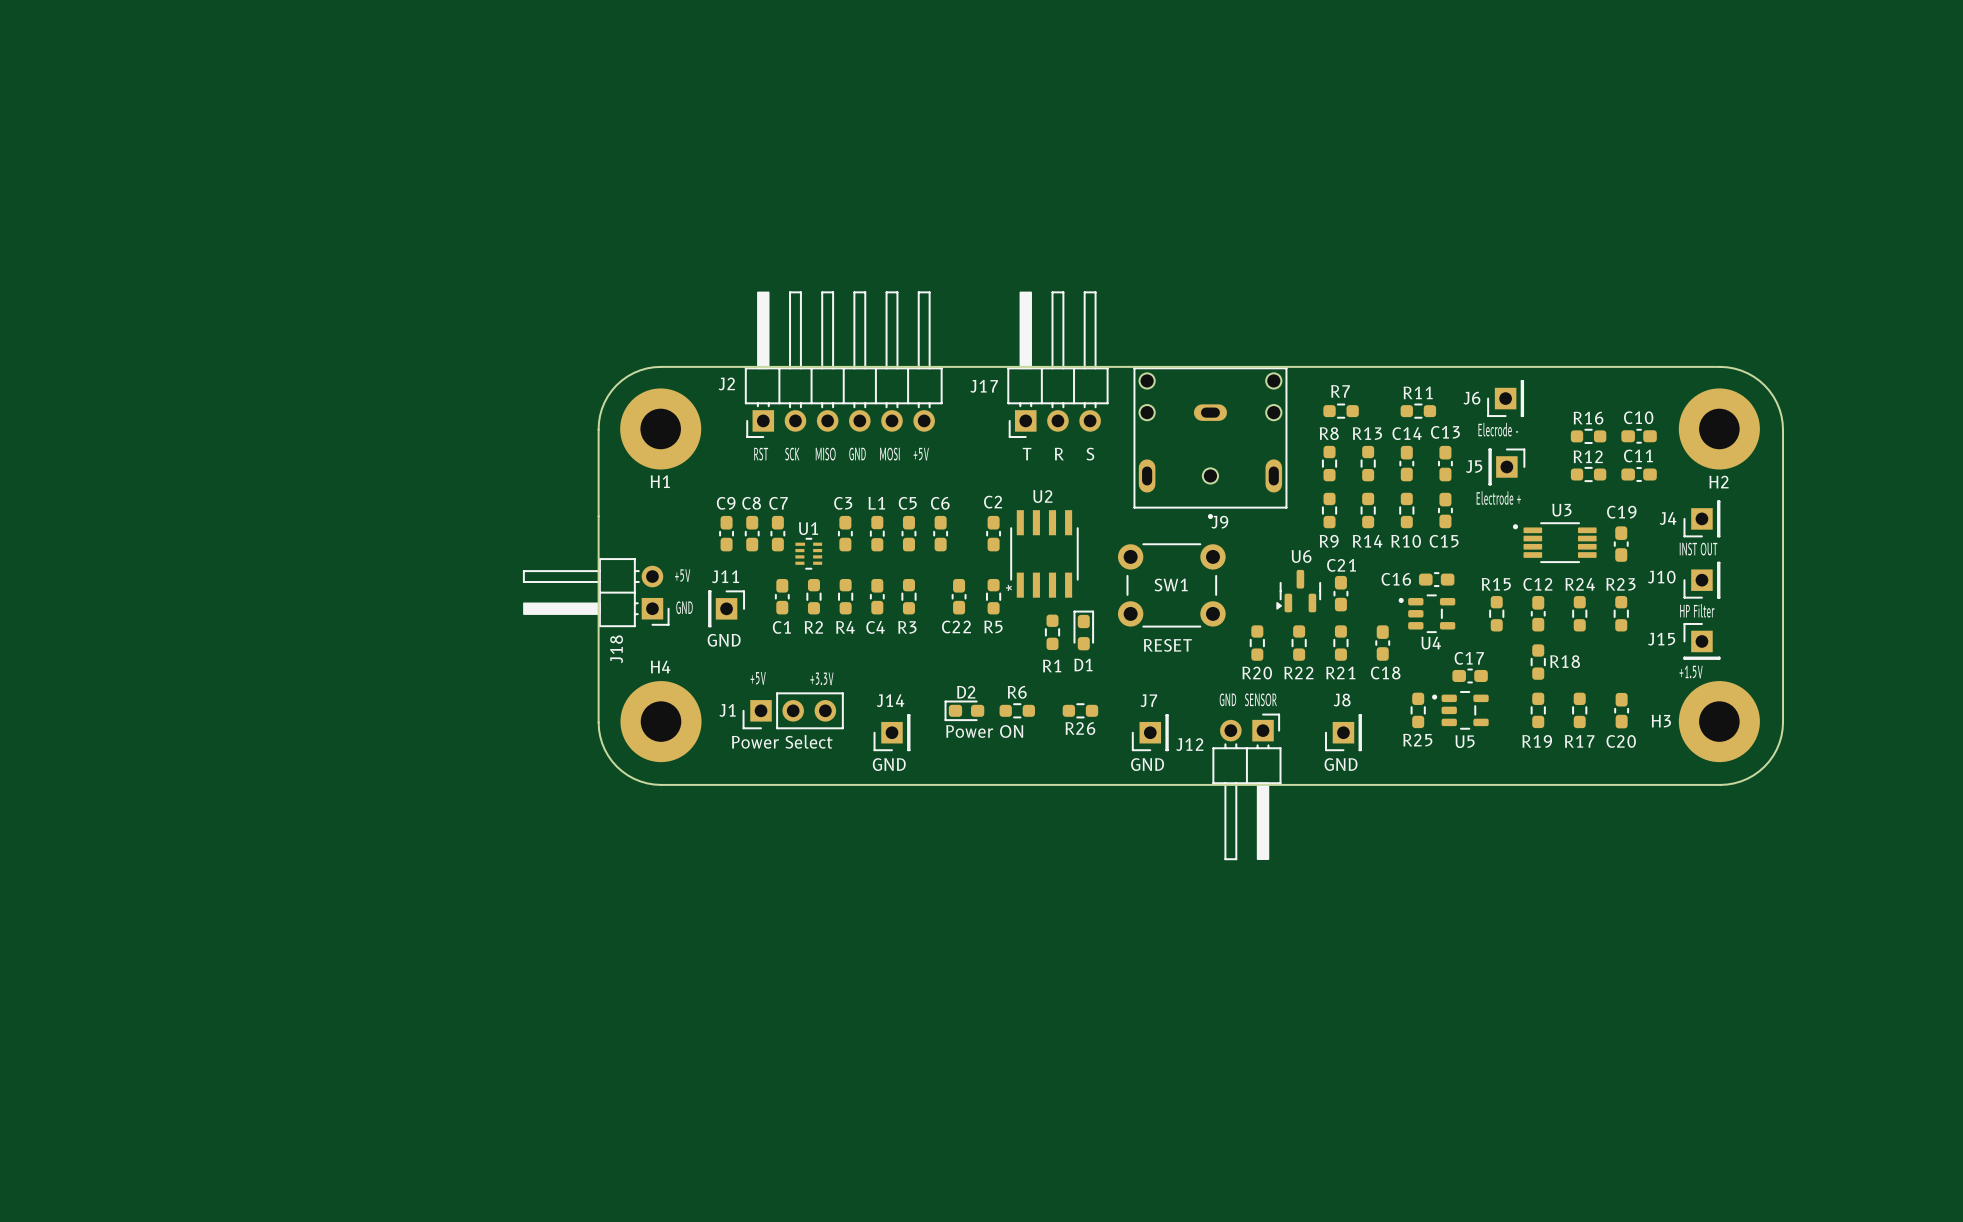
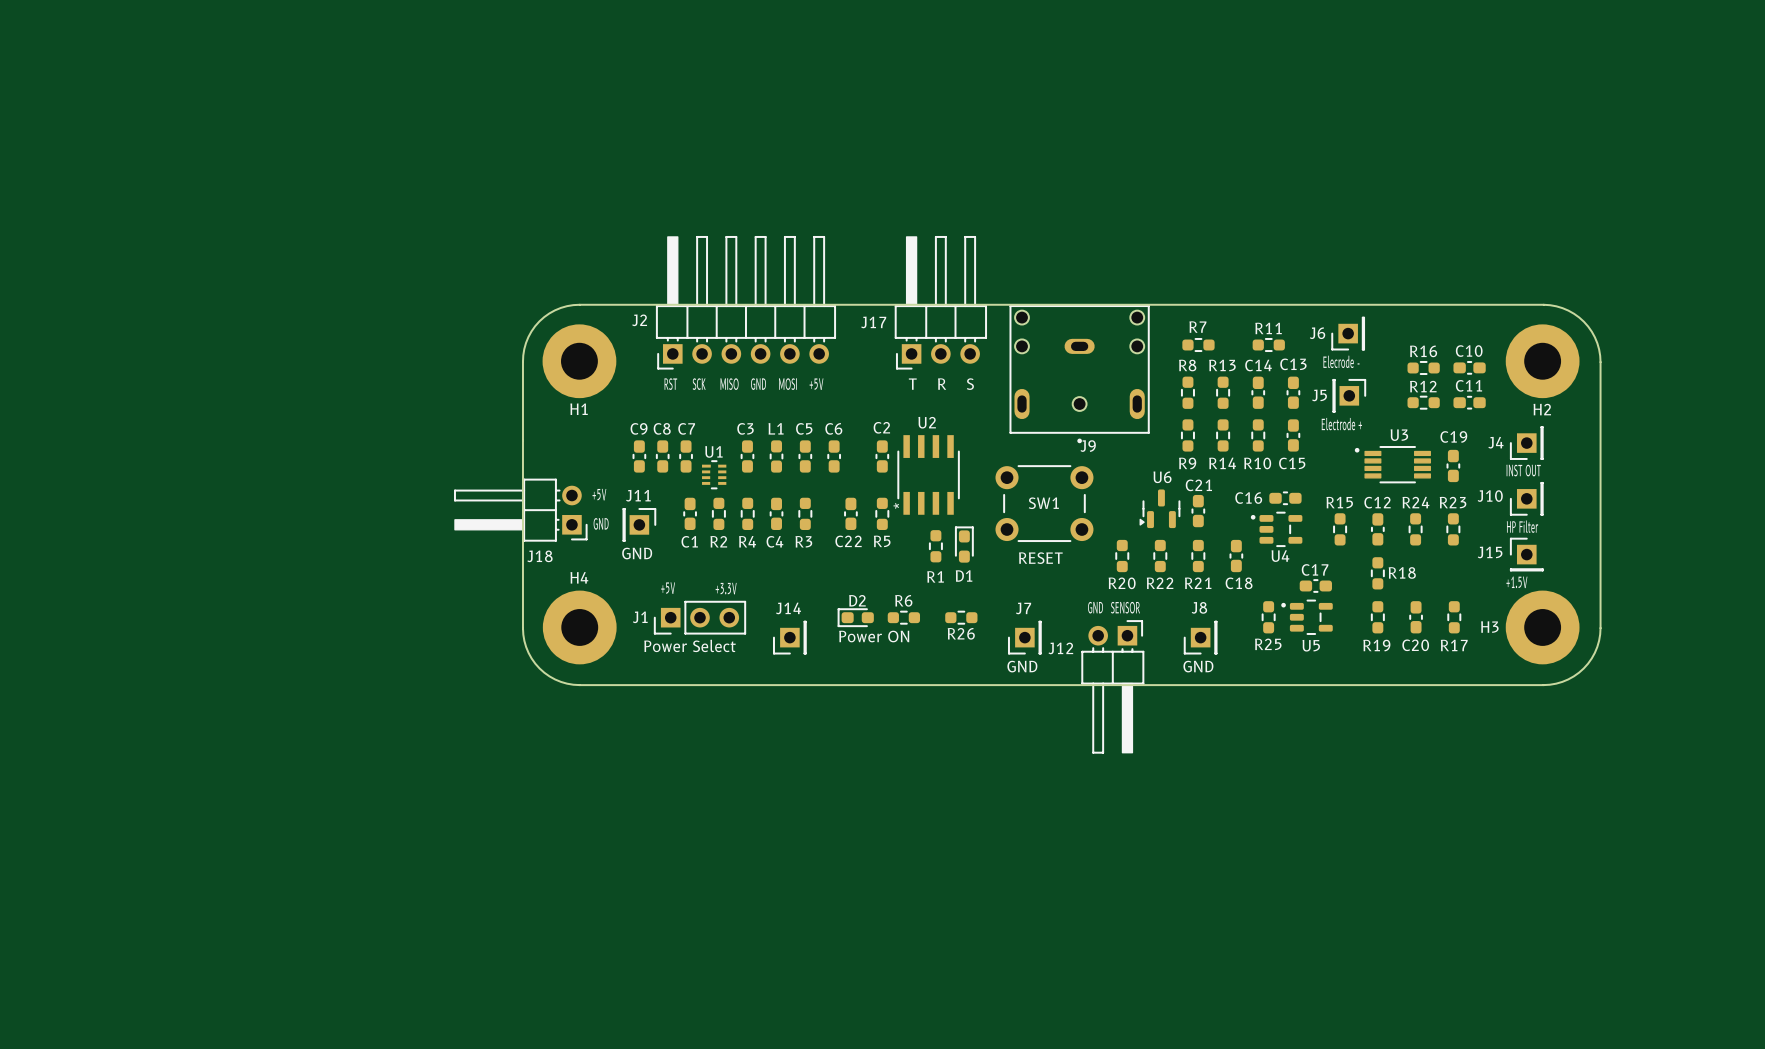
J18 name rotation: 0° (616, 649) -> 90° clockwise (539, 556)
R17 position: (1579, 710) -> (1454, 617)
C20 position: (1621, 710) -> (1416, 617)
text: GND (889, 764) -> none

